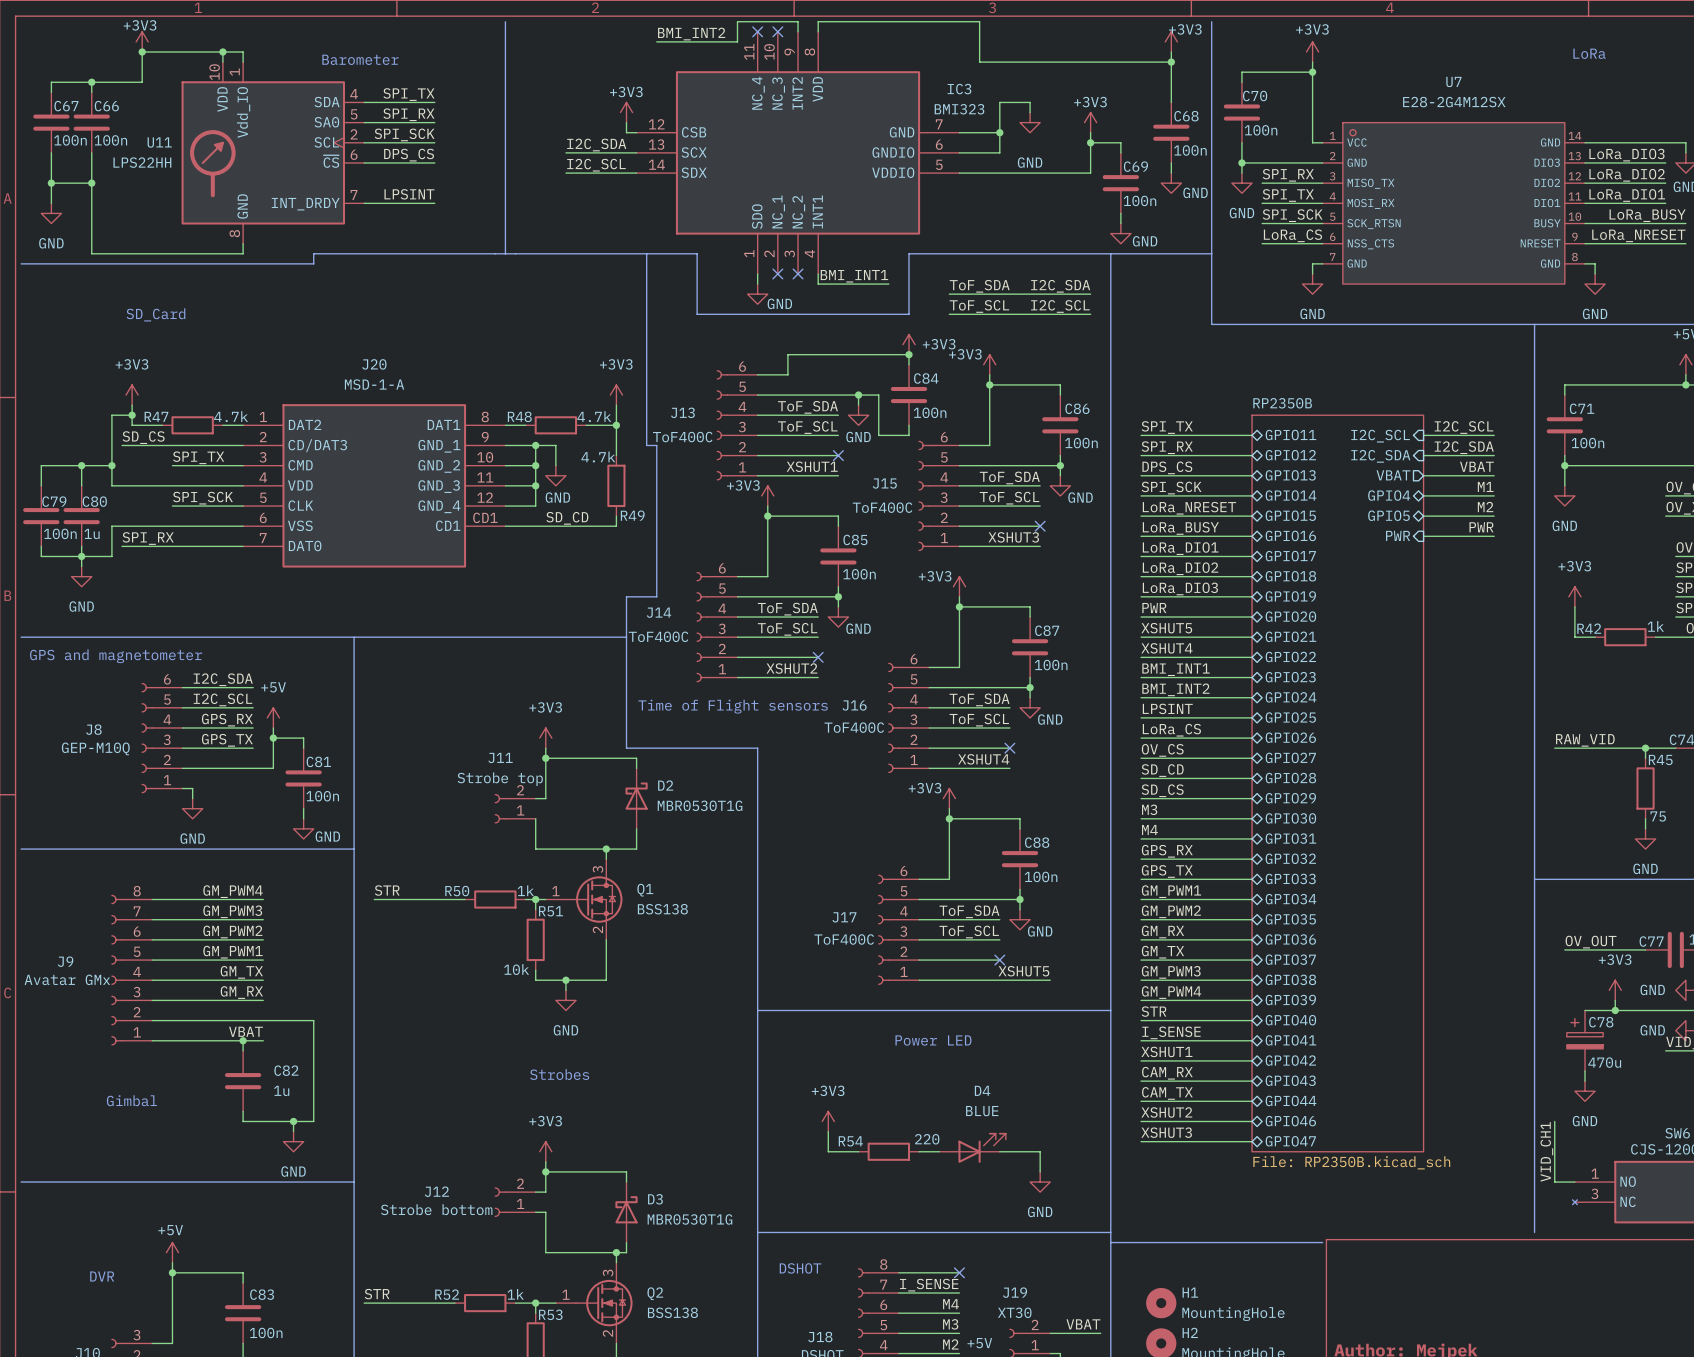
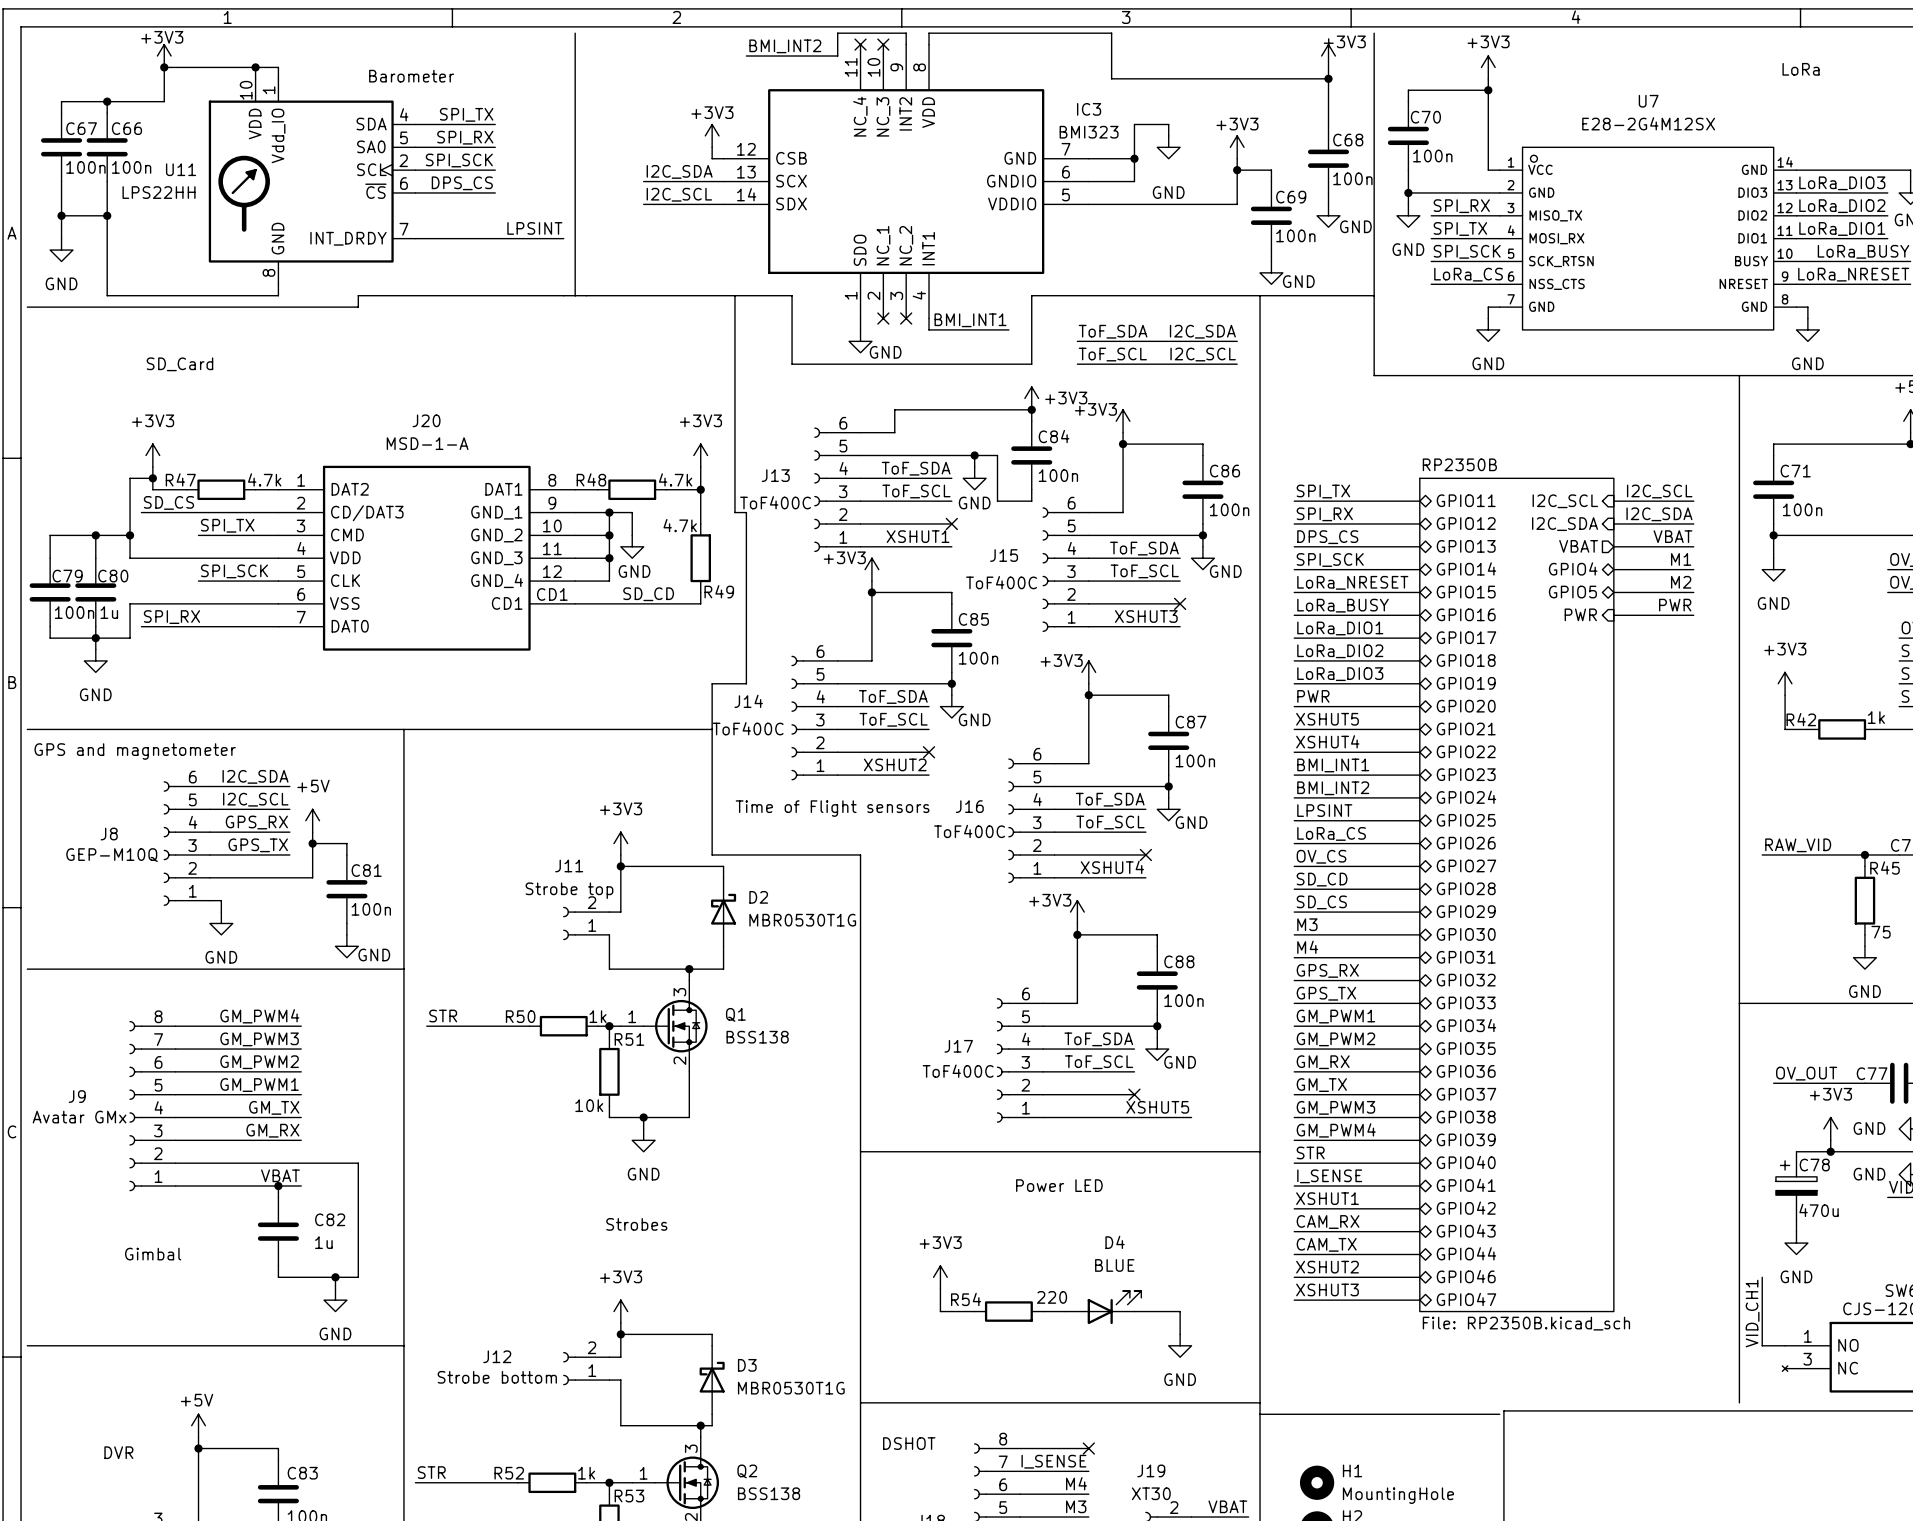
label position: LPSINT (409, 194) -> LPSINT (534, 228)
wire: none -> (495, 238) (563, 238)

